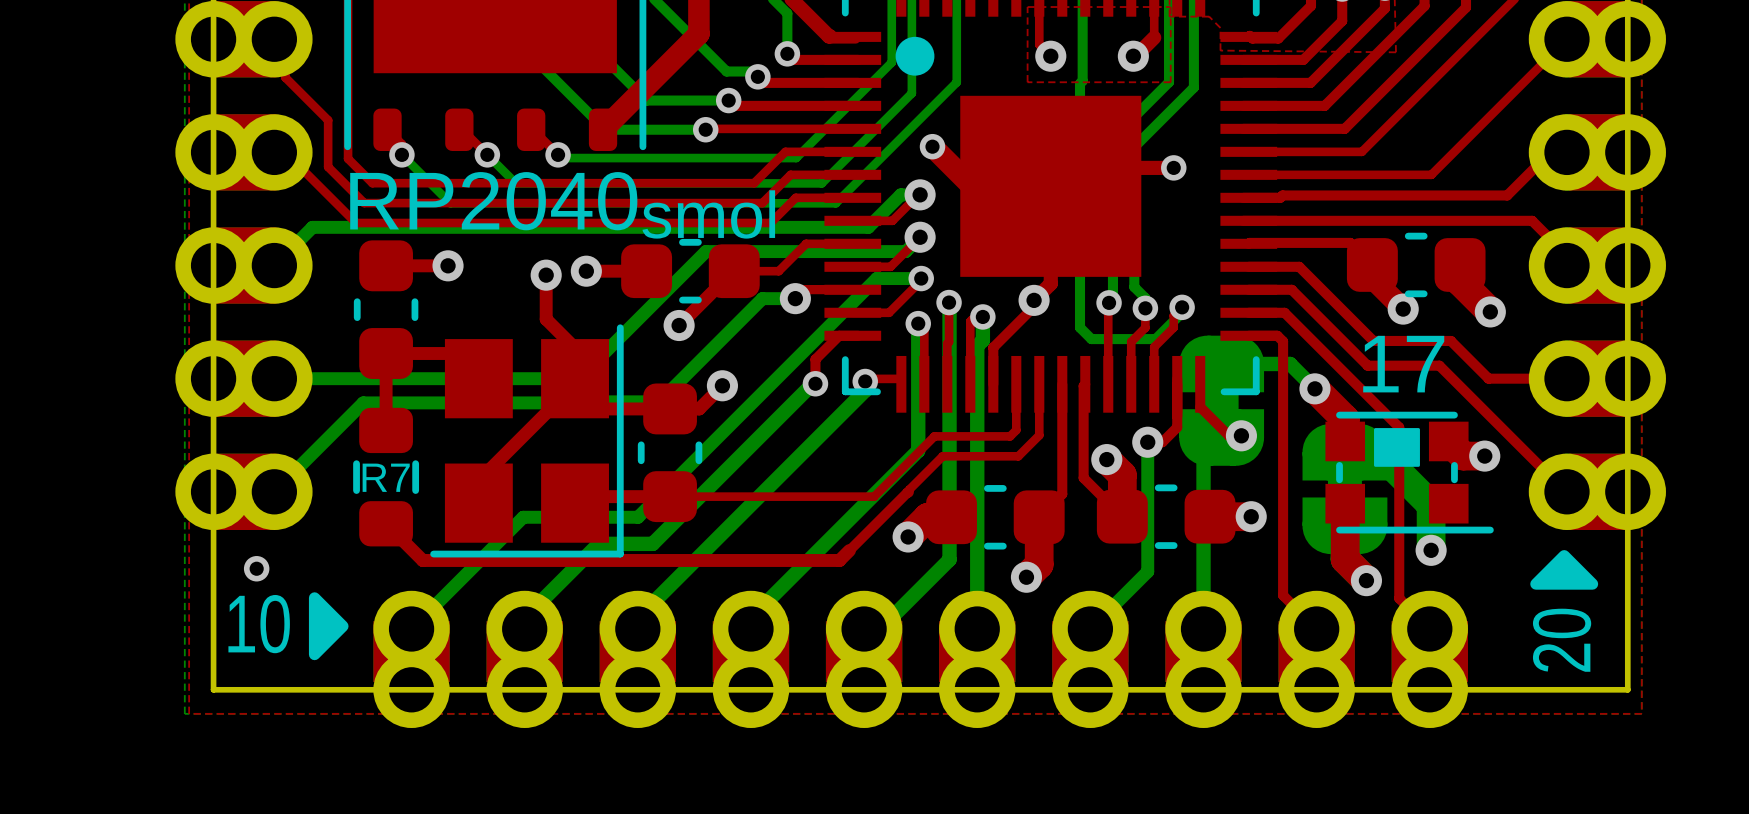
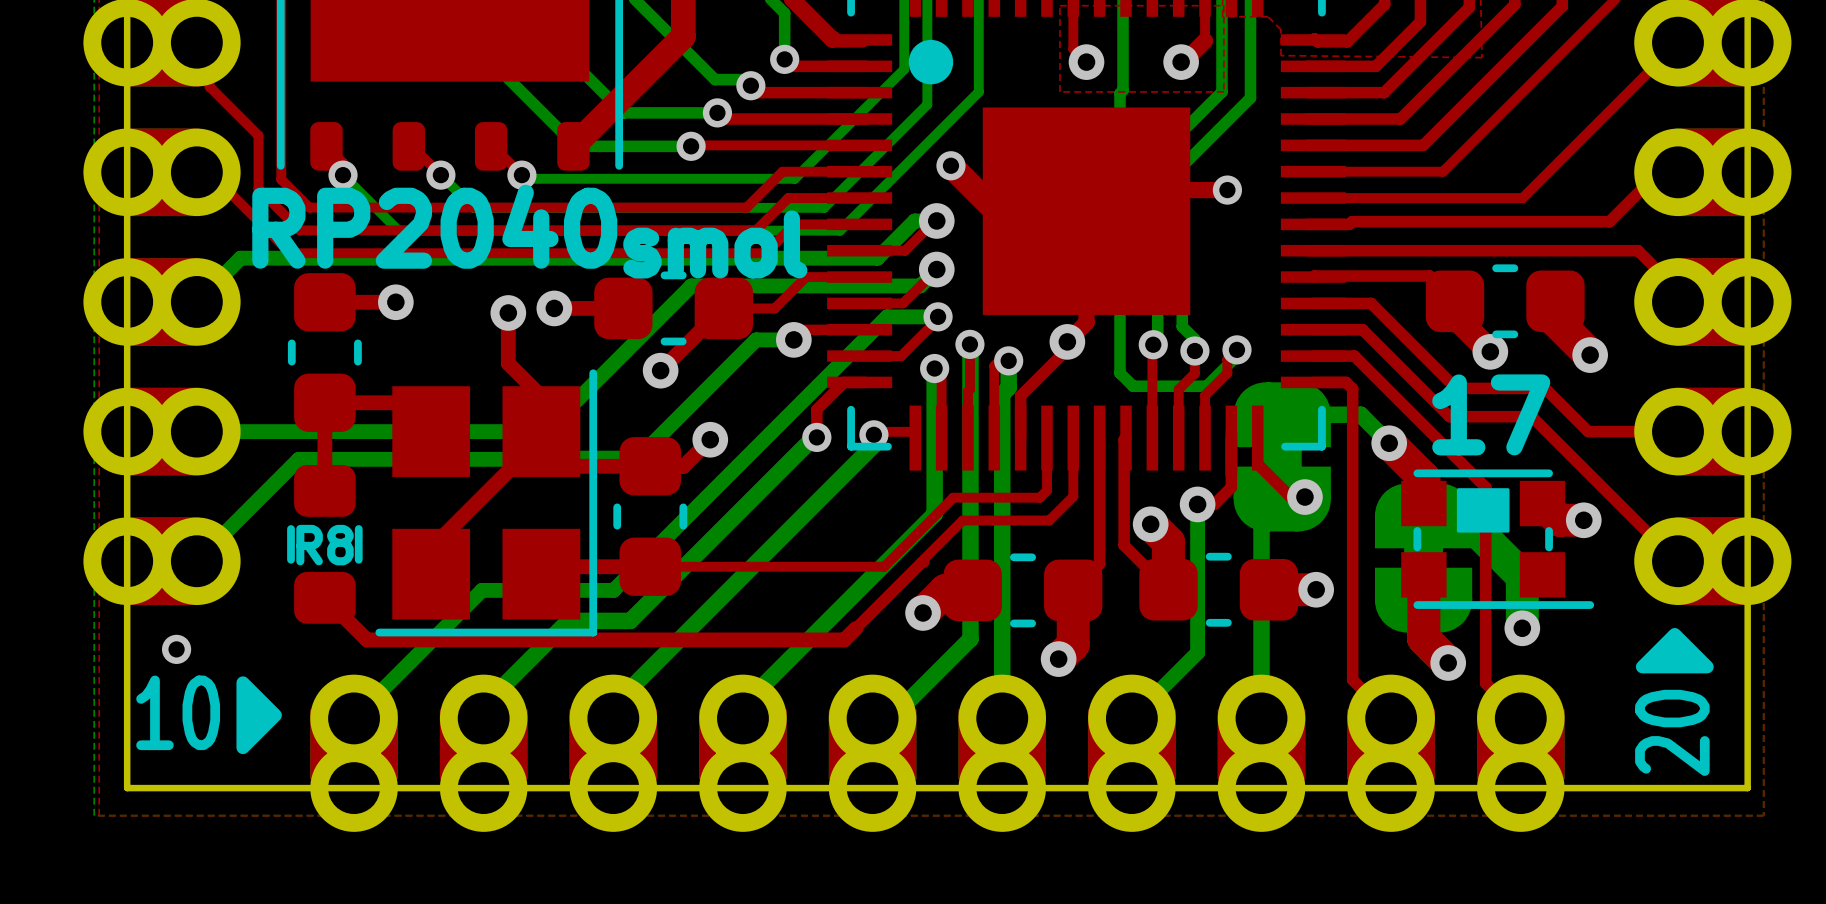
R7 name: R7 (386, 477) -> R8 (325, 545)

